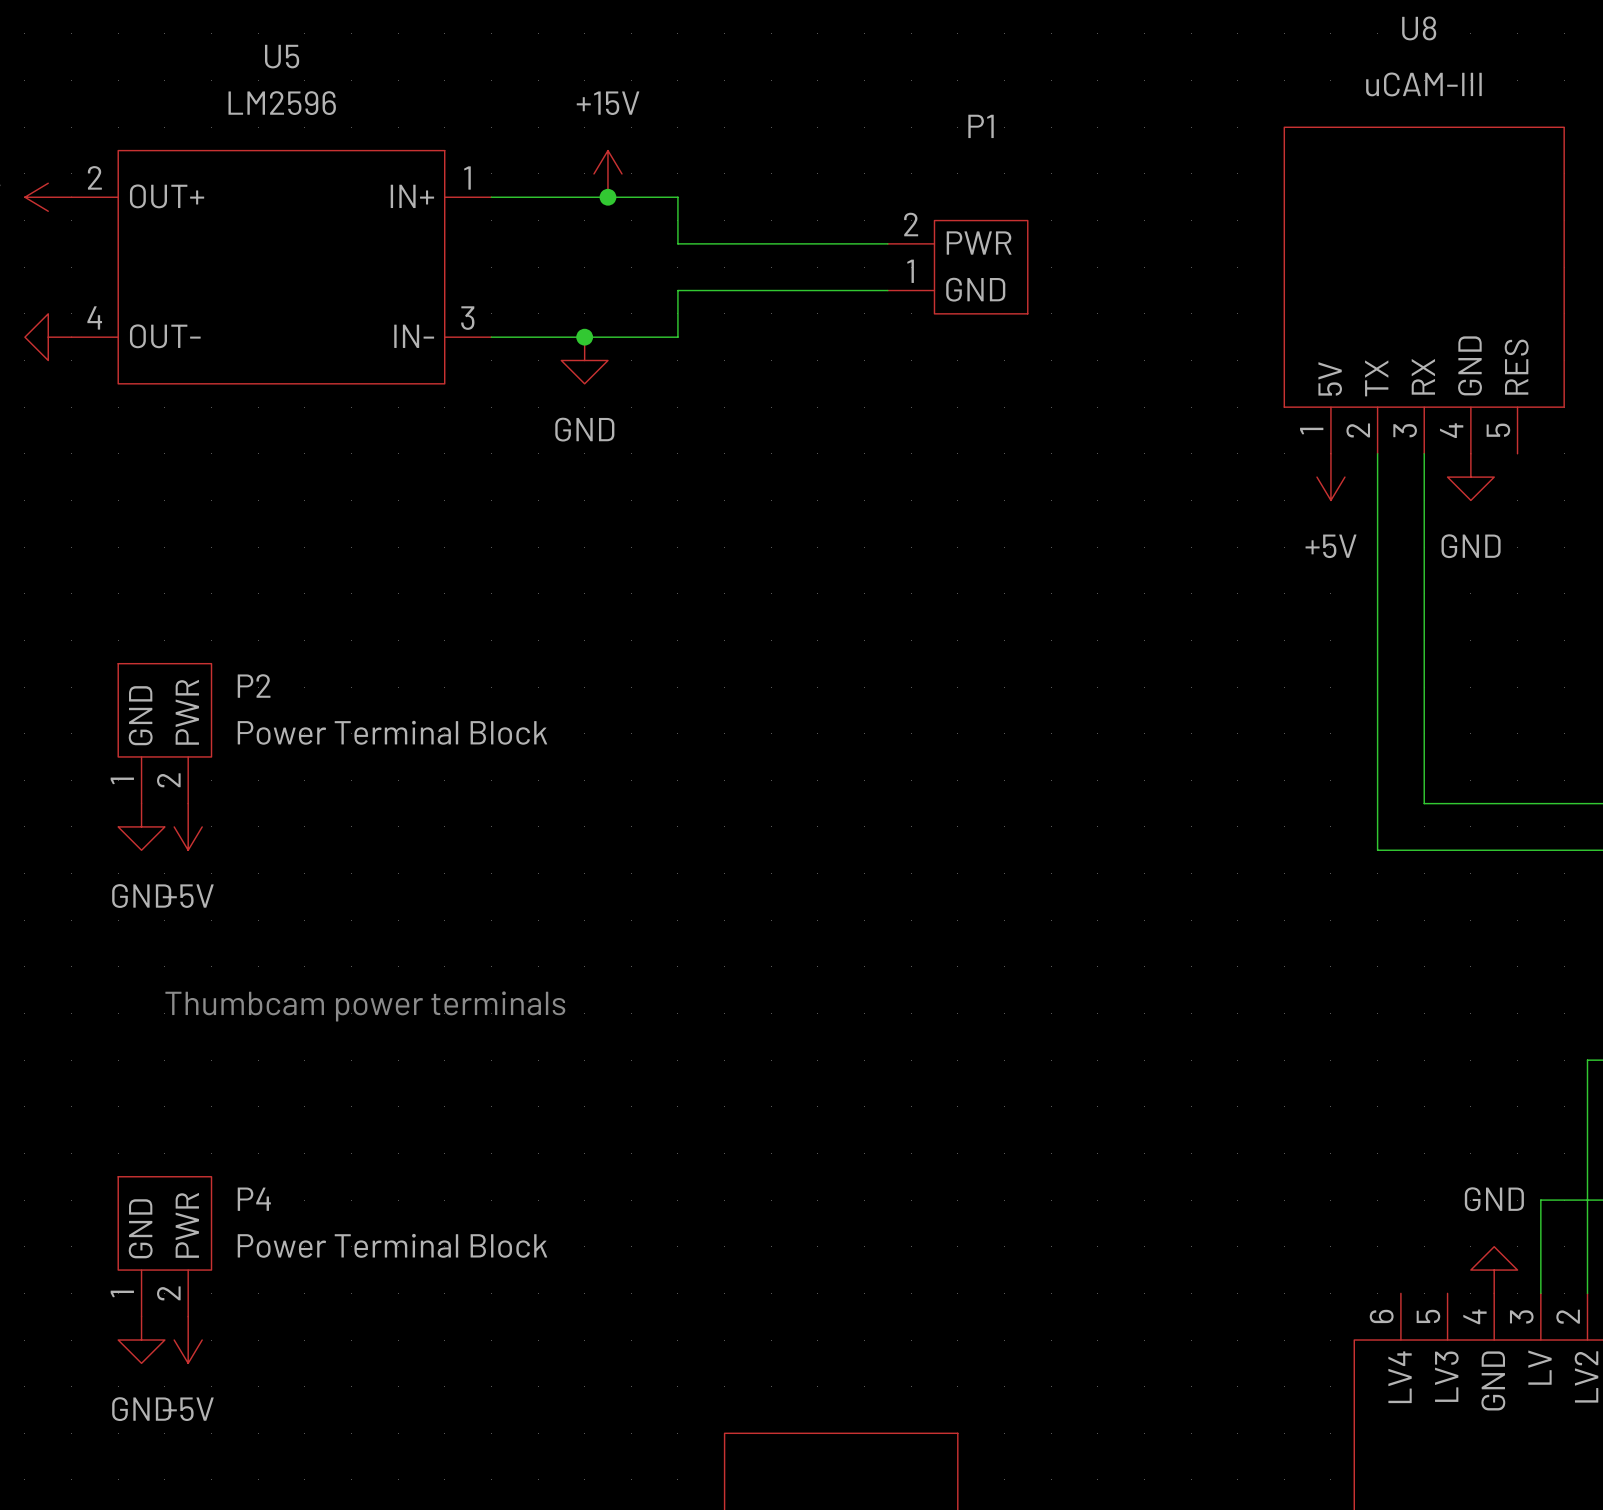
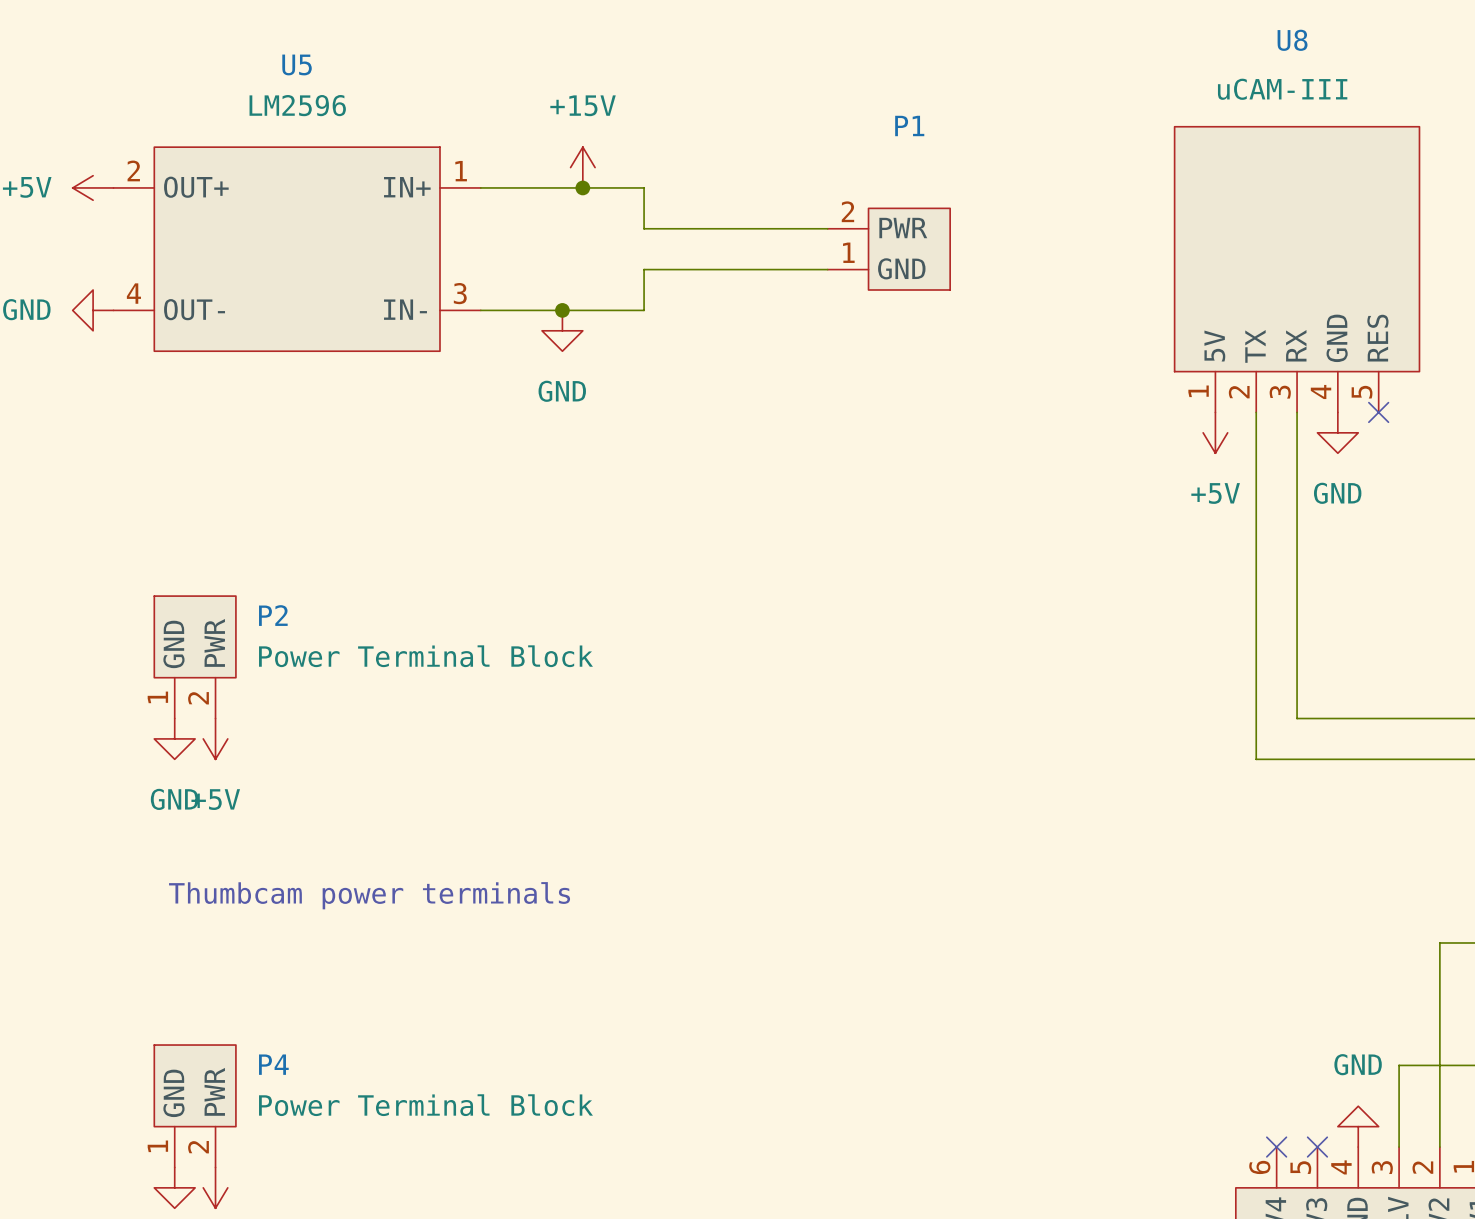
no-connect mark: none -> (1378, 412)
no-connect mark: none -> (1276, 1147)
no-connect mark: none -> (1317, 1147)

